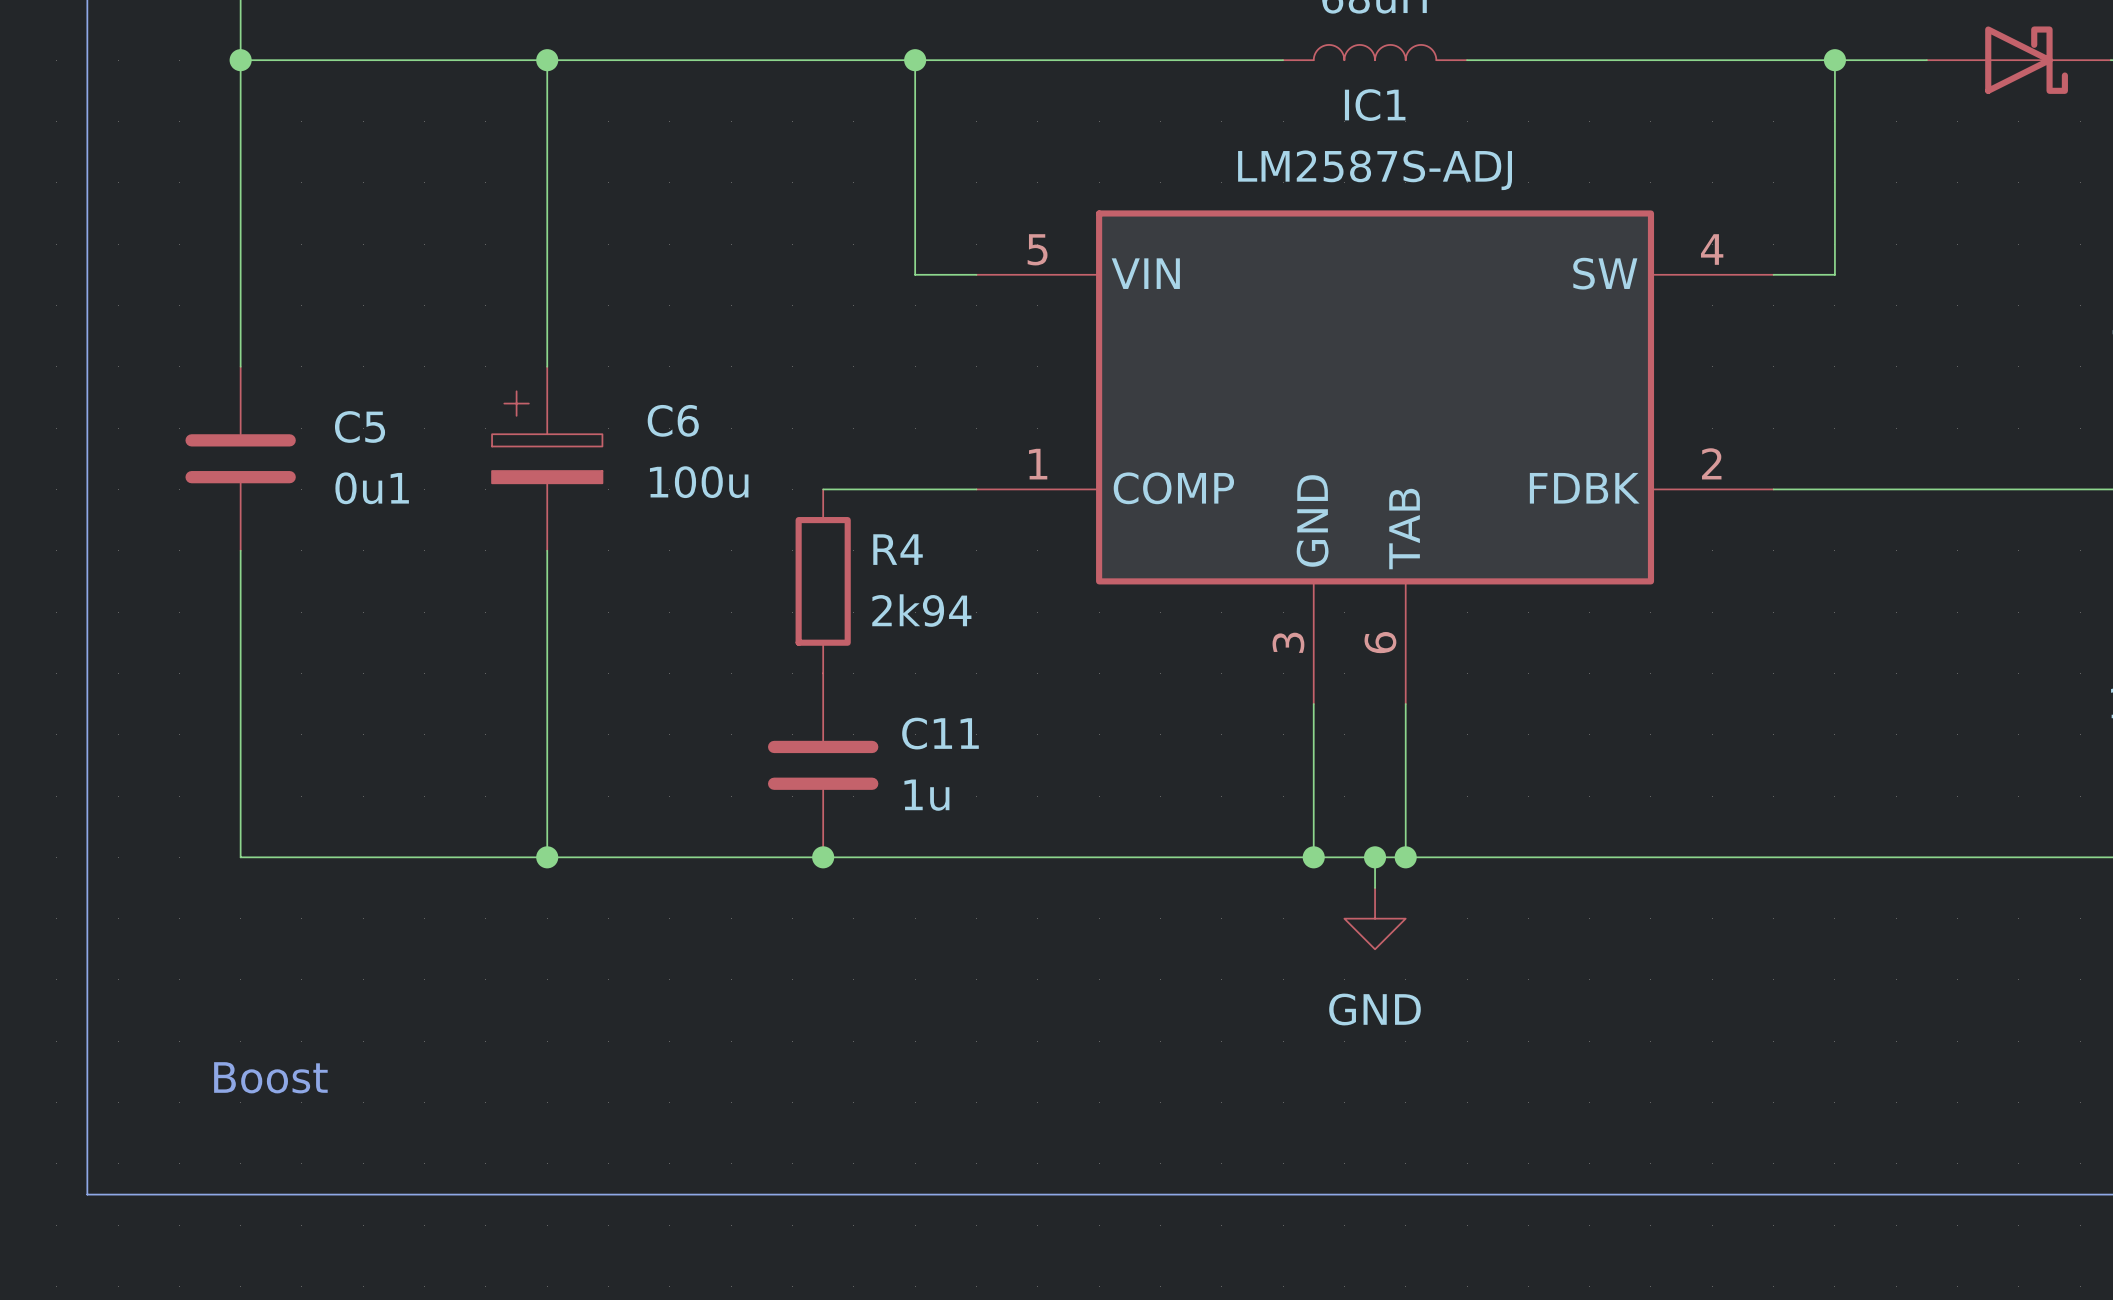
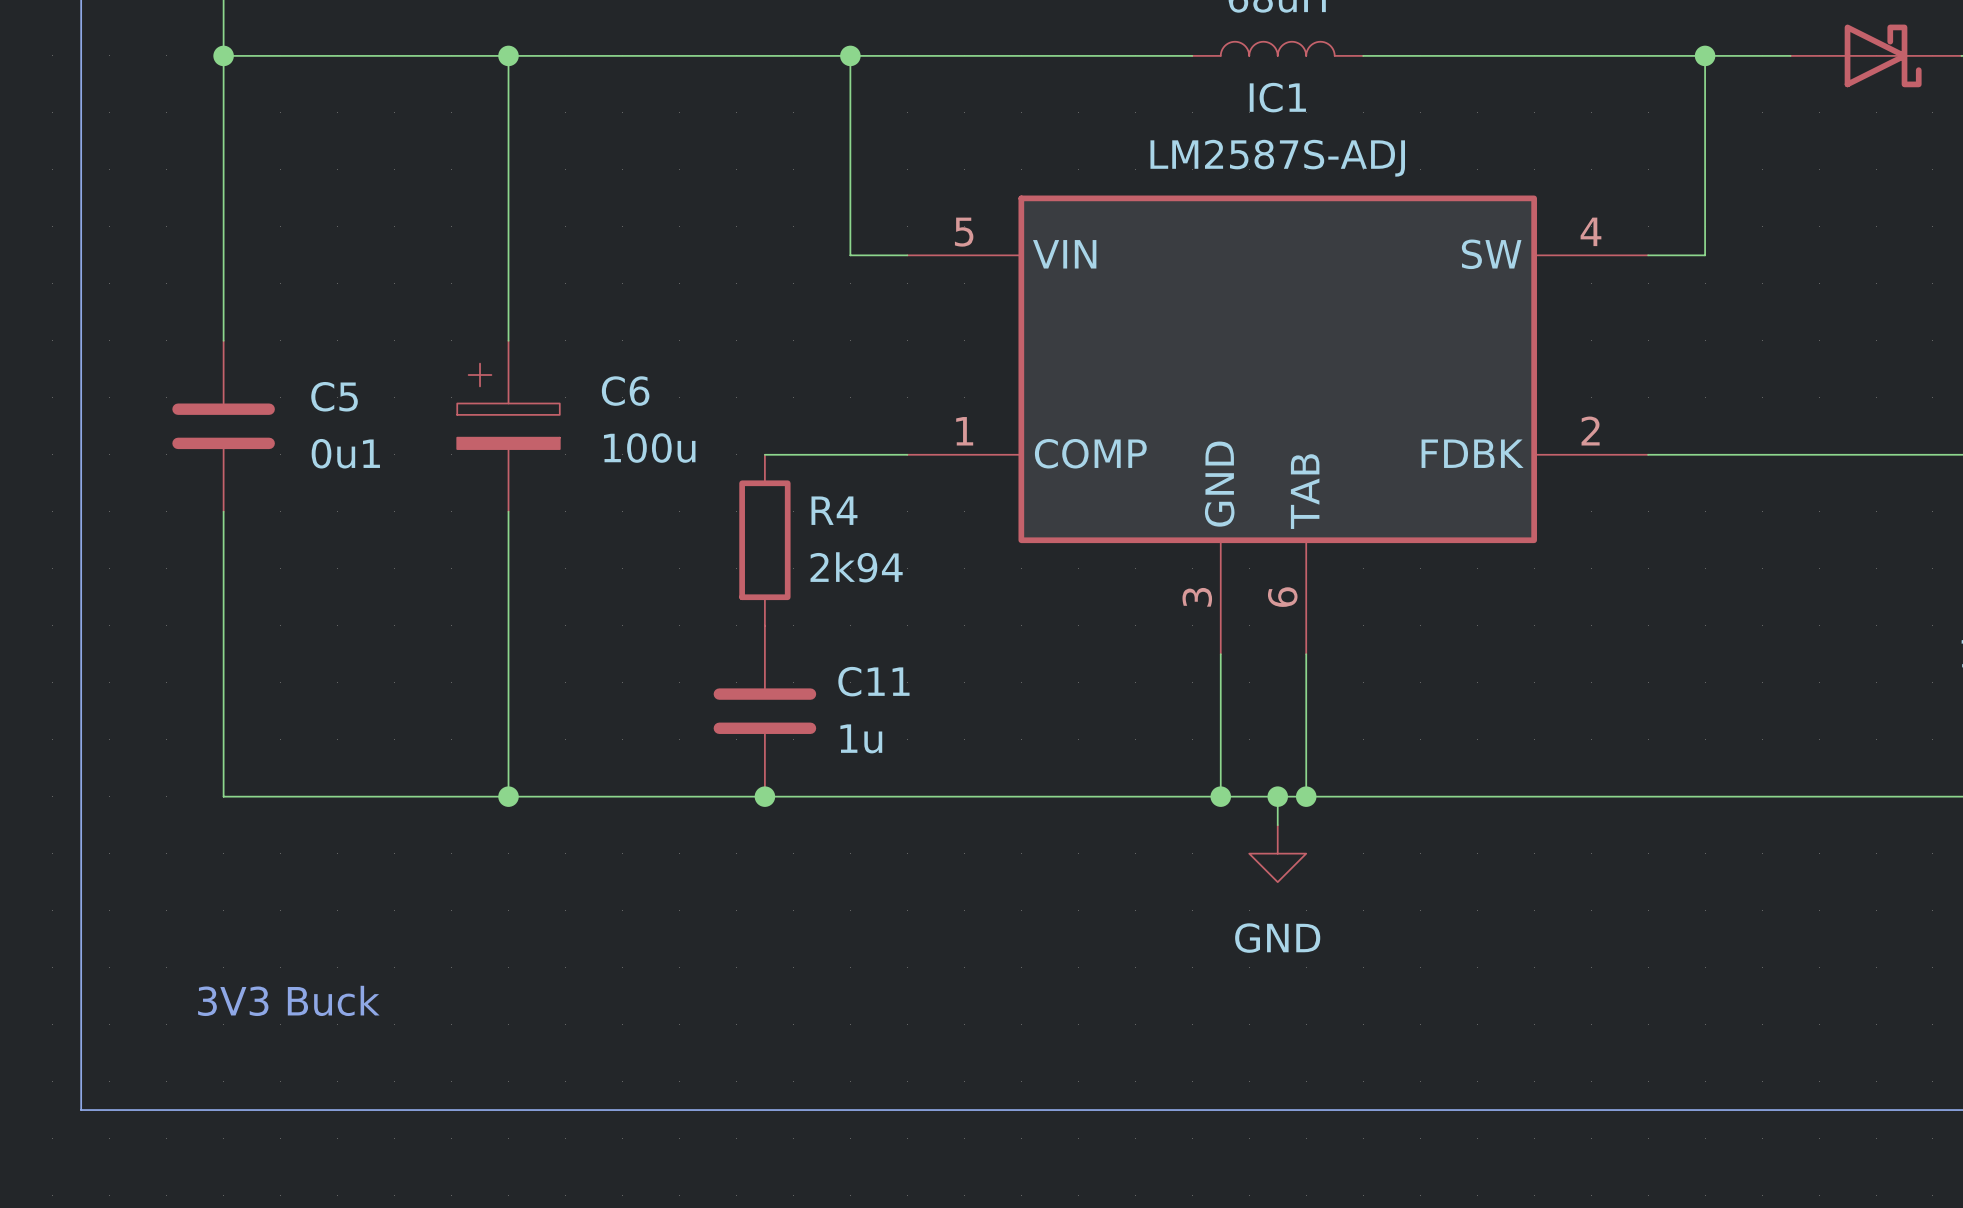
text: Boost (270, 1077) -> 3V3 Buck (288, 1000)

